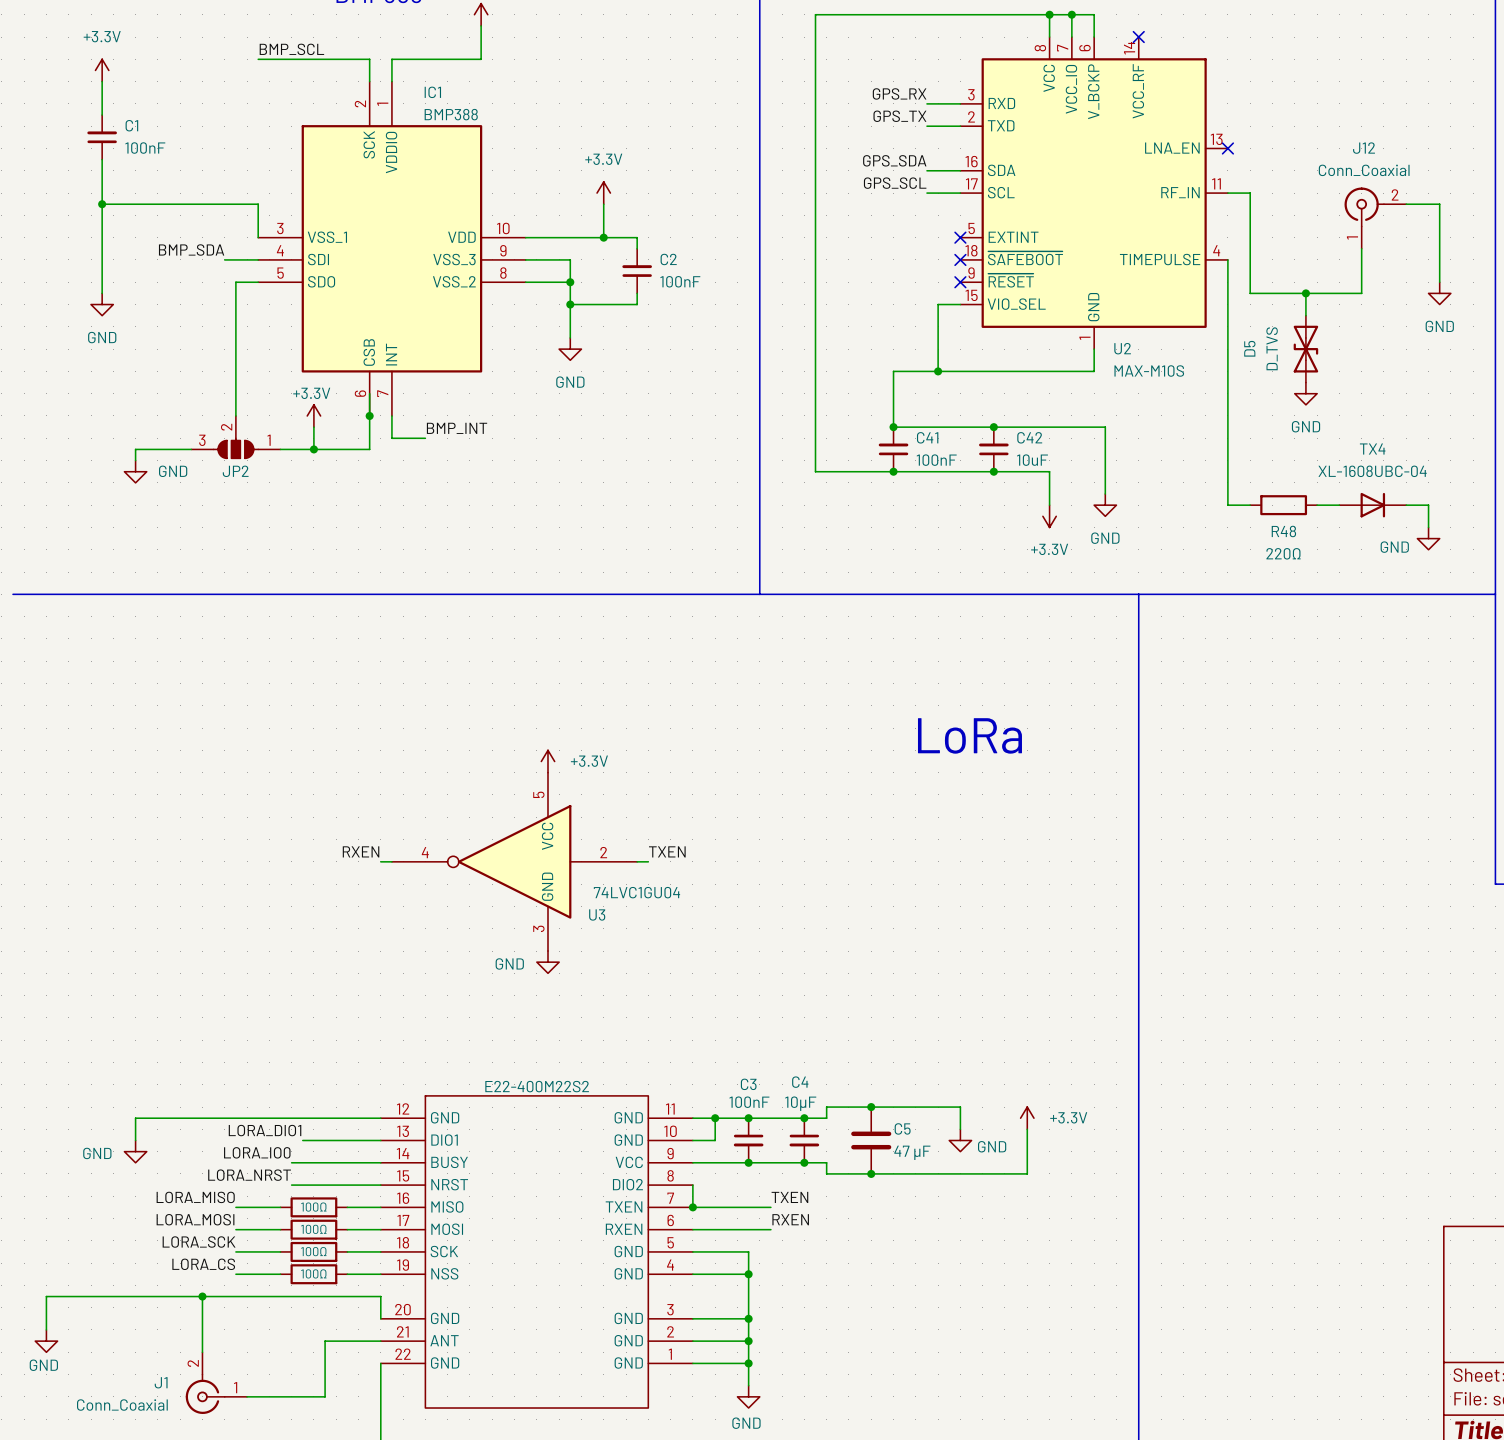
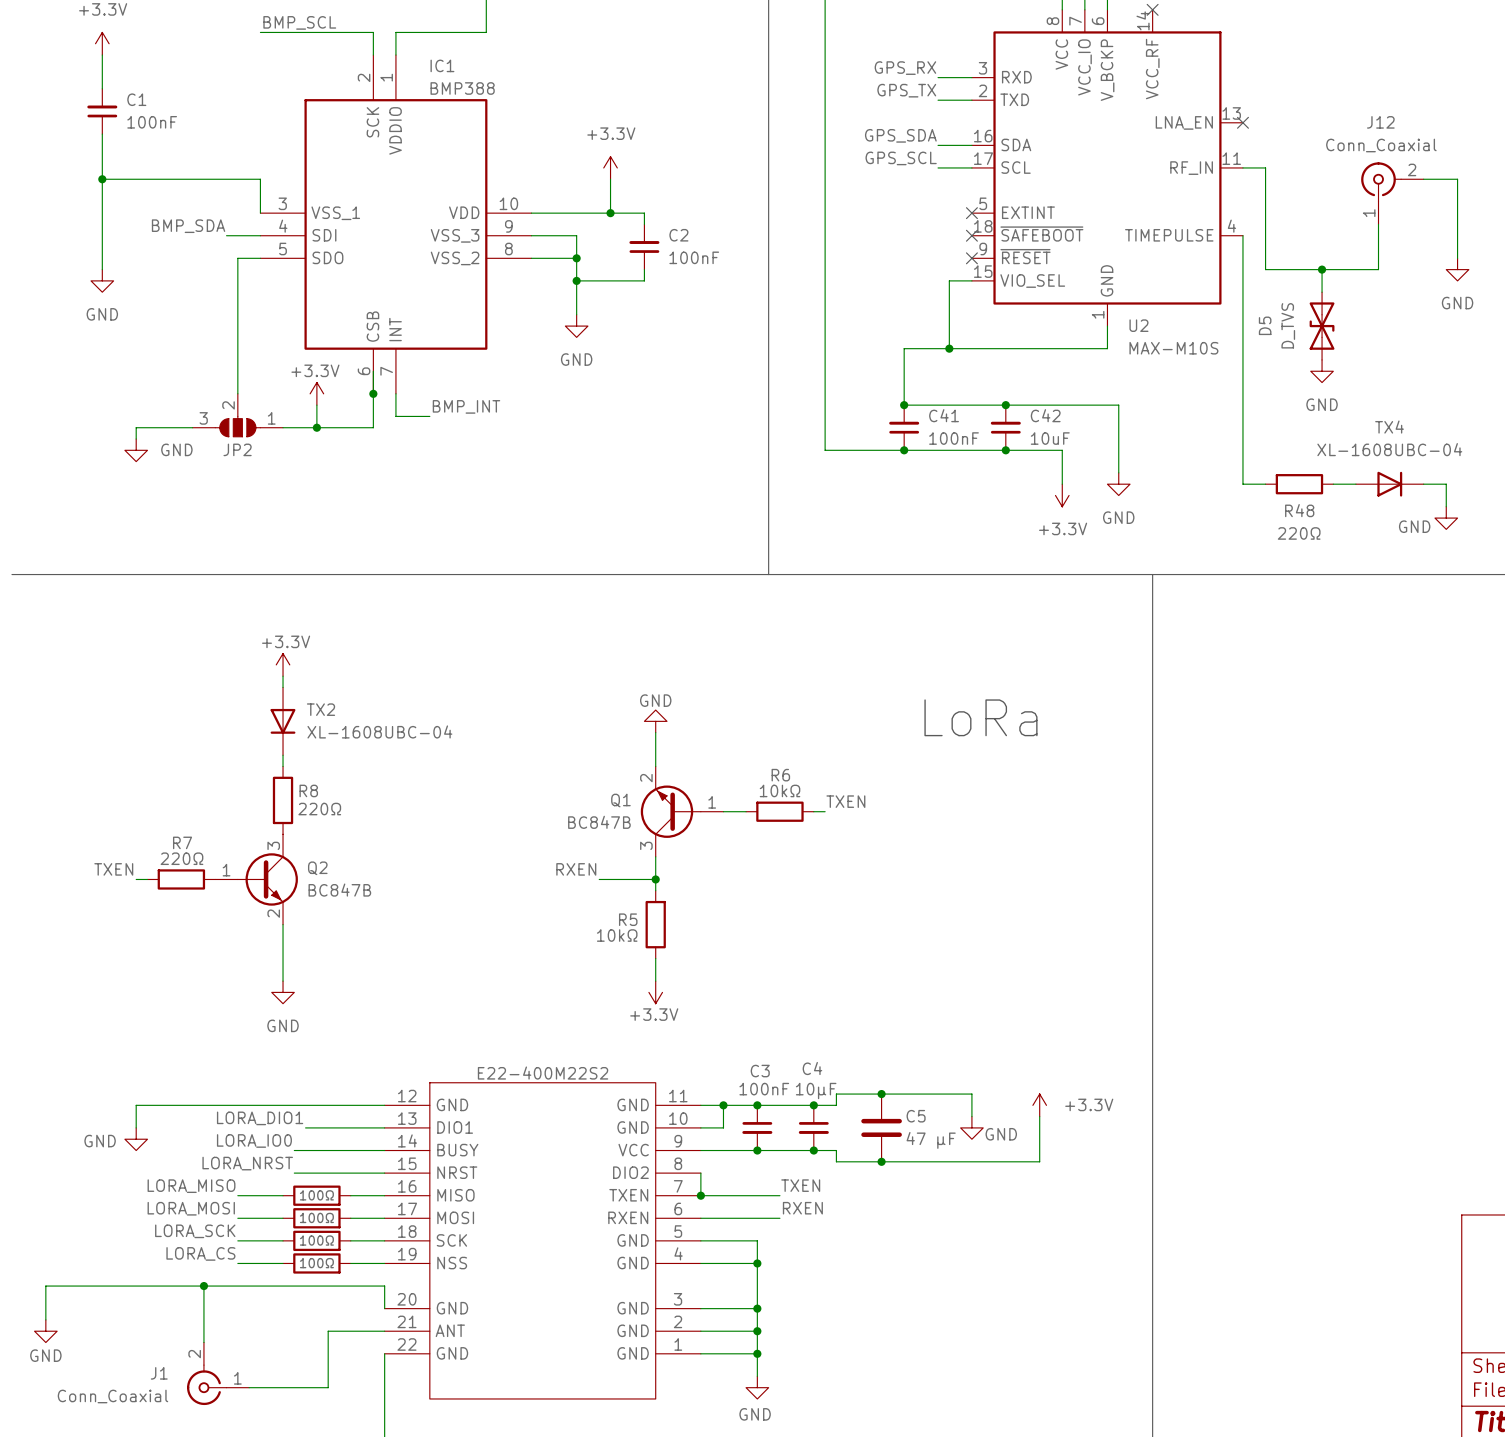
power symbol: none -> +3.3V (283, 664)
wire: none -> (283, 676) (283, 687)
TX2: none -> XL-1608UBC-04 (283, 721)
power symbol: none -> GND (655, 721)
wire: none -> (655, 732) (655, 766)
power symbol: +3.3V (547, 761) -> none
wire: none -> (283, 755) (283, 766)
R8: none -> 220Ω (283, 800)
Q1: none -> BC847B (682, 811)
wire: none -> (723, 811) (746, 811)
R6: none -> 10kΩ (779, 811)
label position: RXEN (361, 851) -> RXEN (576, 869)
label position: TXEN (667, 851) -> TXEN (845, 801)
wire: (380, 861) (391, 861) -> none
U3: 74LVC1GU04 (514, 861) -> none
wire: (637, 861) (648, 861) -> (813, 811) (825, 811)
wire: none -> (655, 856) (655, 890)
label: none -> TXEN (113, 869)
wire: none -> (136, 879) (147, 879)
R7: none -> 220Ω (181, 879)
Q2: none -> BC847B (256, 879)
wire: none -> (599, 879) (655, 879)
junction: none -> (655, 879)
wire: none -> (283, 924) (283, 981)
R5: none -> 10kΩ (655, 924)
power symbol: GND (547, 962) -> none
wire: none -> (655, 958) (655, 981)
power symbol: none -> GND (283, 992)
power symbol: none -> +3.3V (655, 992)

